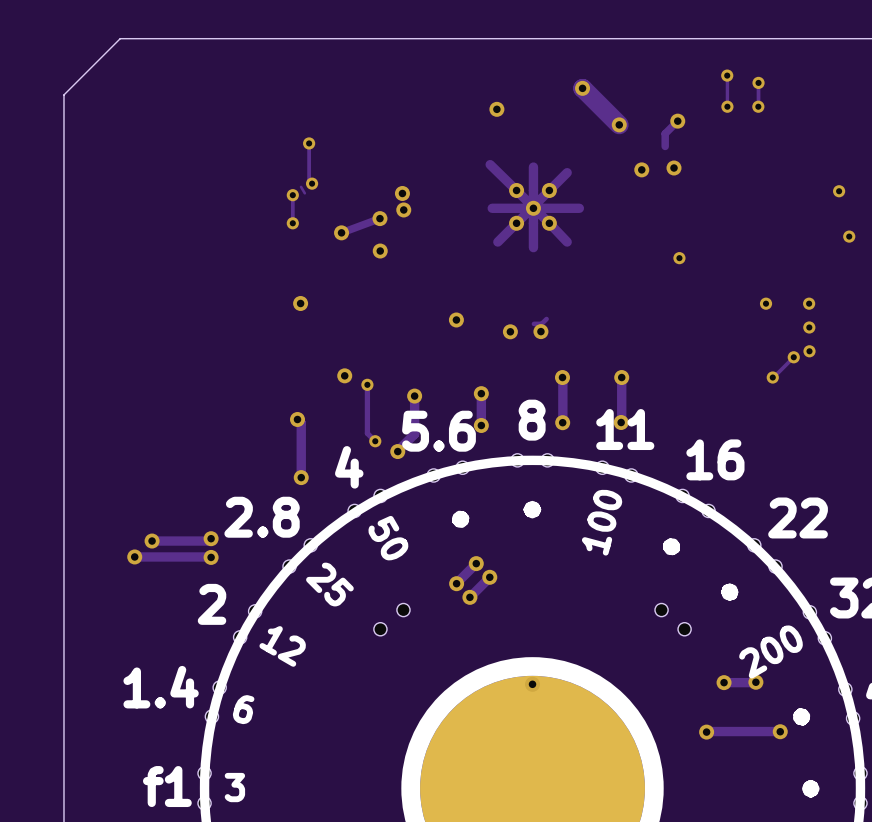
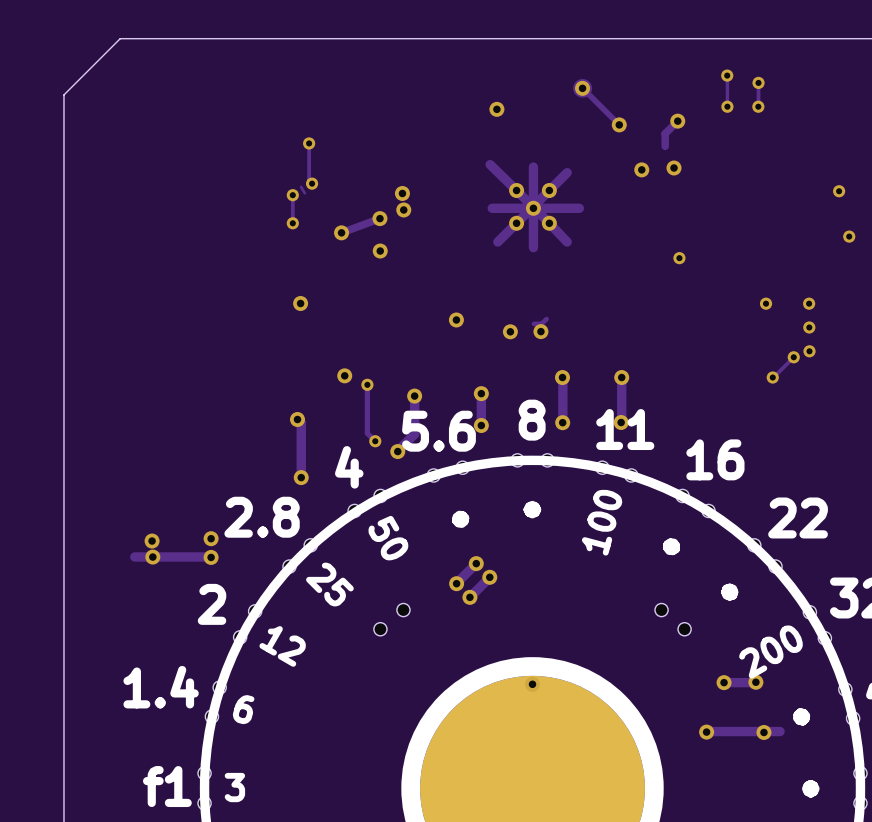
track width: thick (582, 88) (619, 124) -> thin (582, 88) (619, 124)
track: (211, 538) (208, 541) (152, 541) -> none
via position: (134, 556) -> (152, 557)
via position: (780, 731) -> (763, 732)

